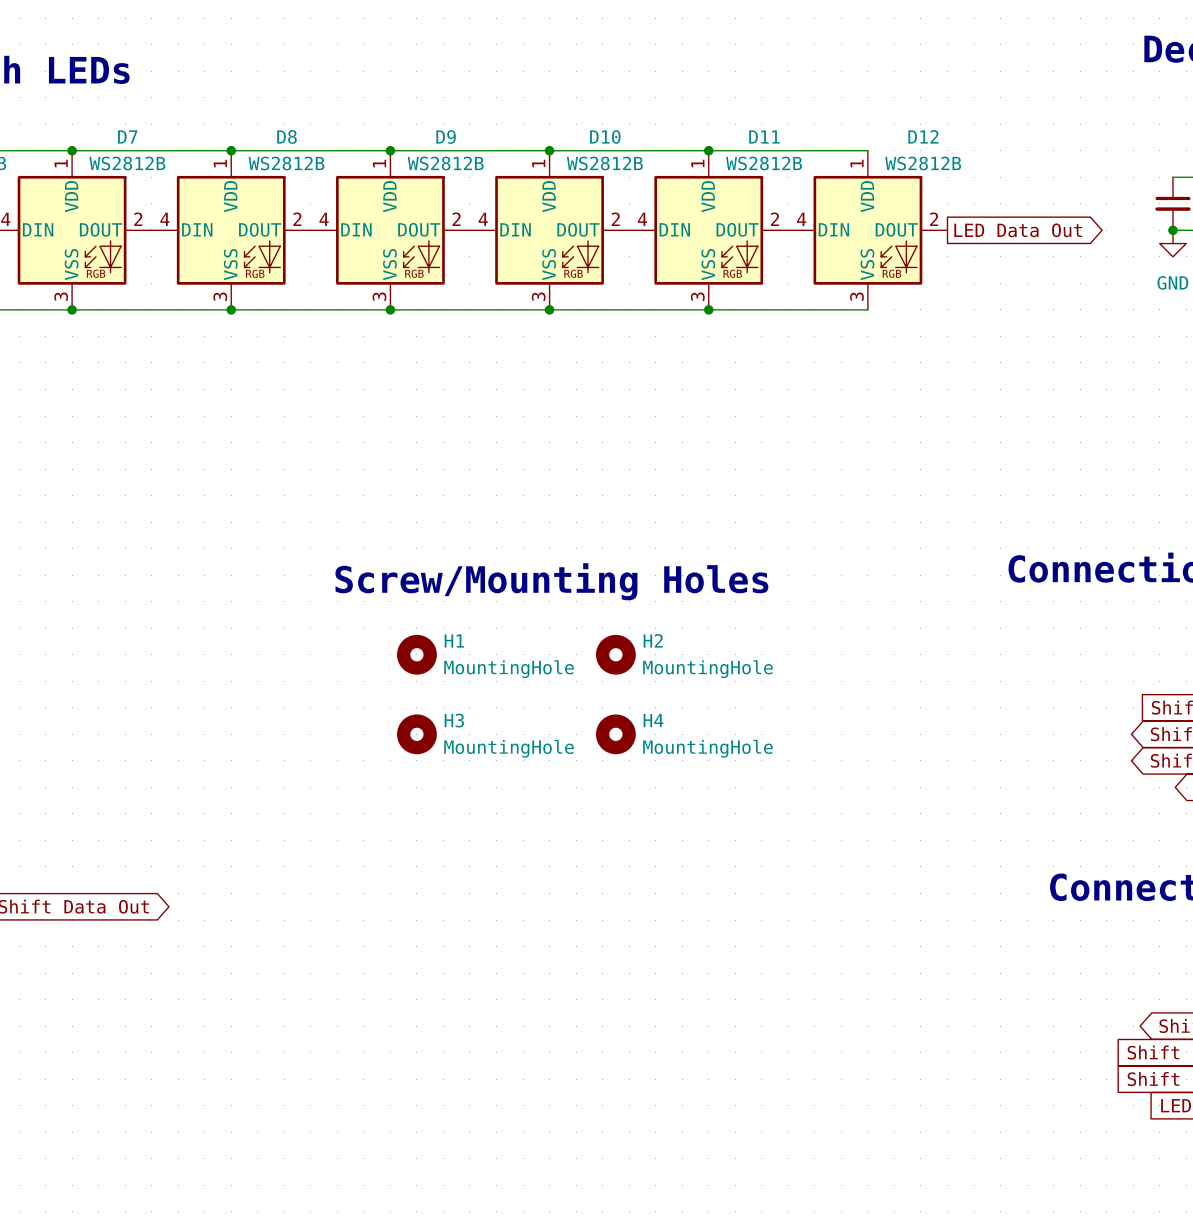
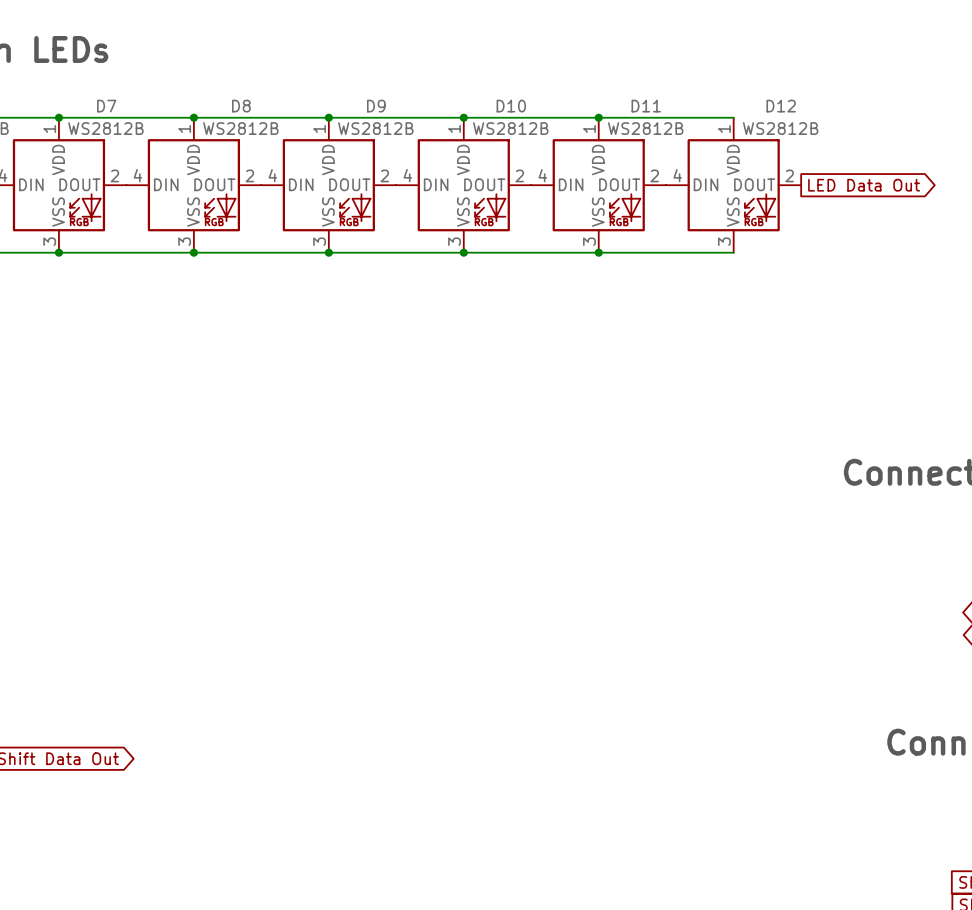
text: Screw/Mounting Holes (551, 581) -> none
H1: MountingHole (416, 654) -> none
H2: MountingHole (615, 654) -> none
H3: MountingHole (416, 734) -> none
H4: MountingHole (615, 734) -> none

